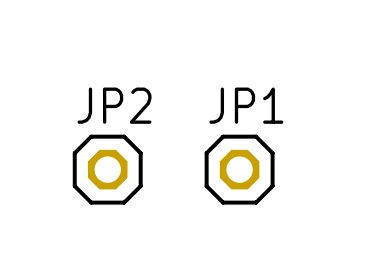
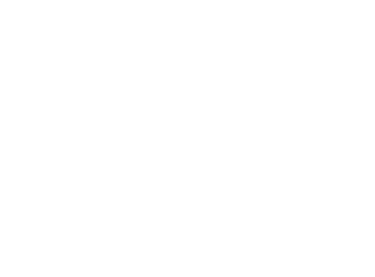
JP2: (107, 169) -> none
JP1: (239, 169) -> none

